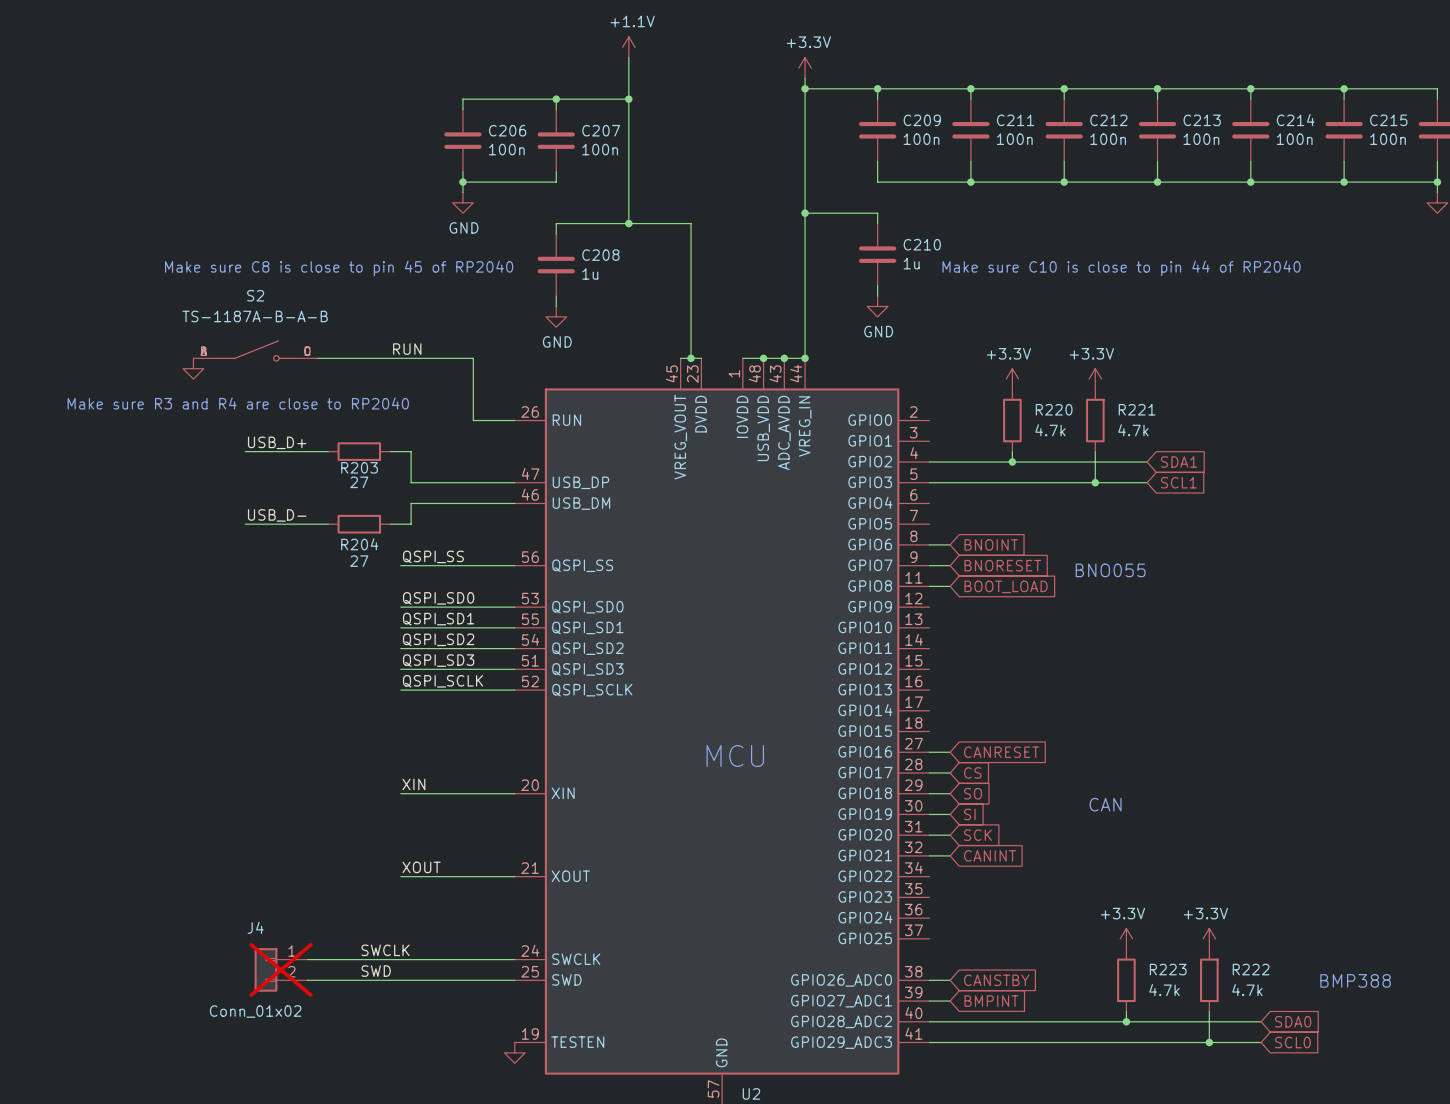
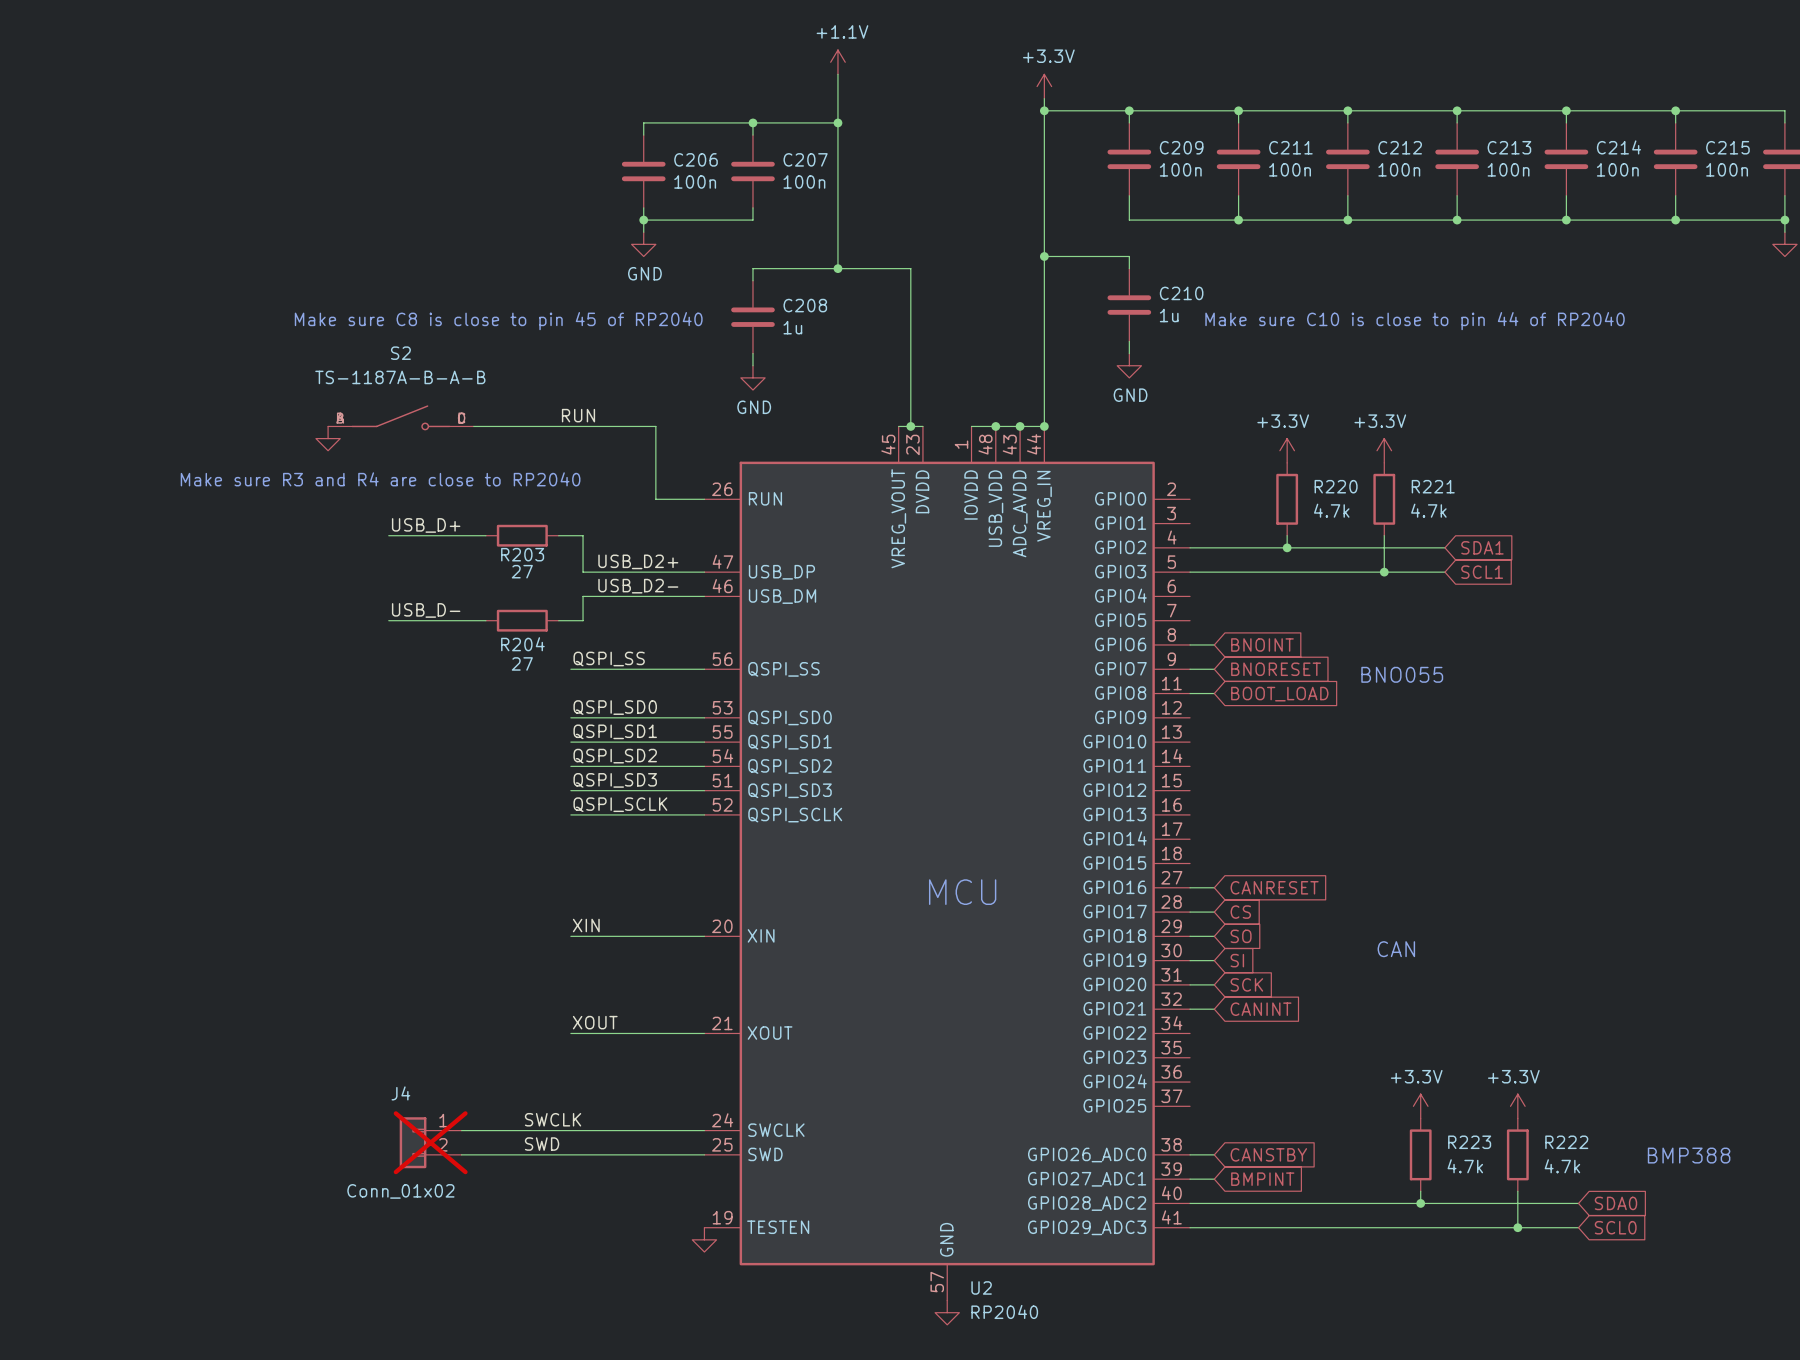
label: none -> USB_D2+ (638, 561)
label: none -> USB_D2- (638, 586)

